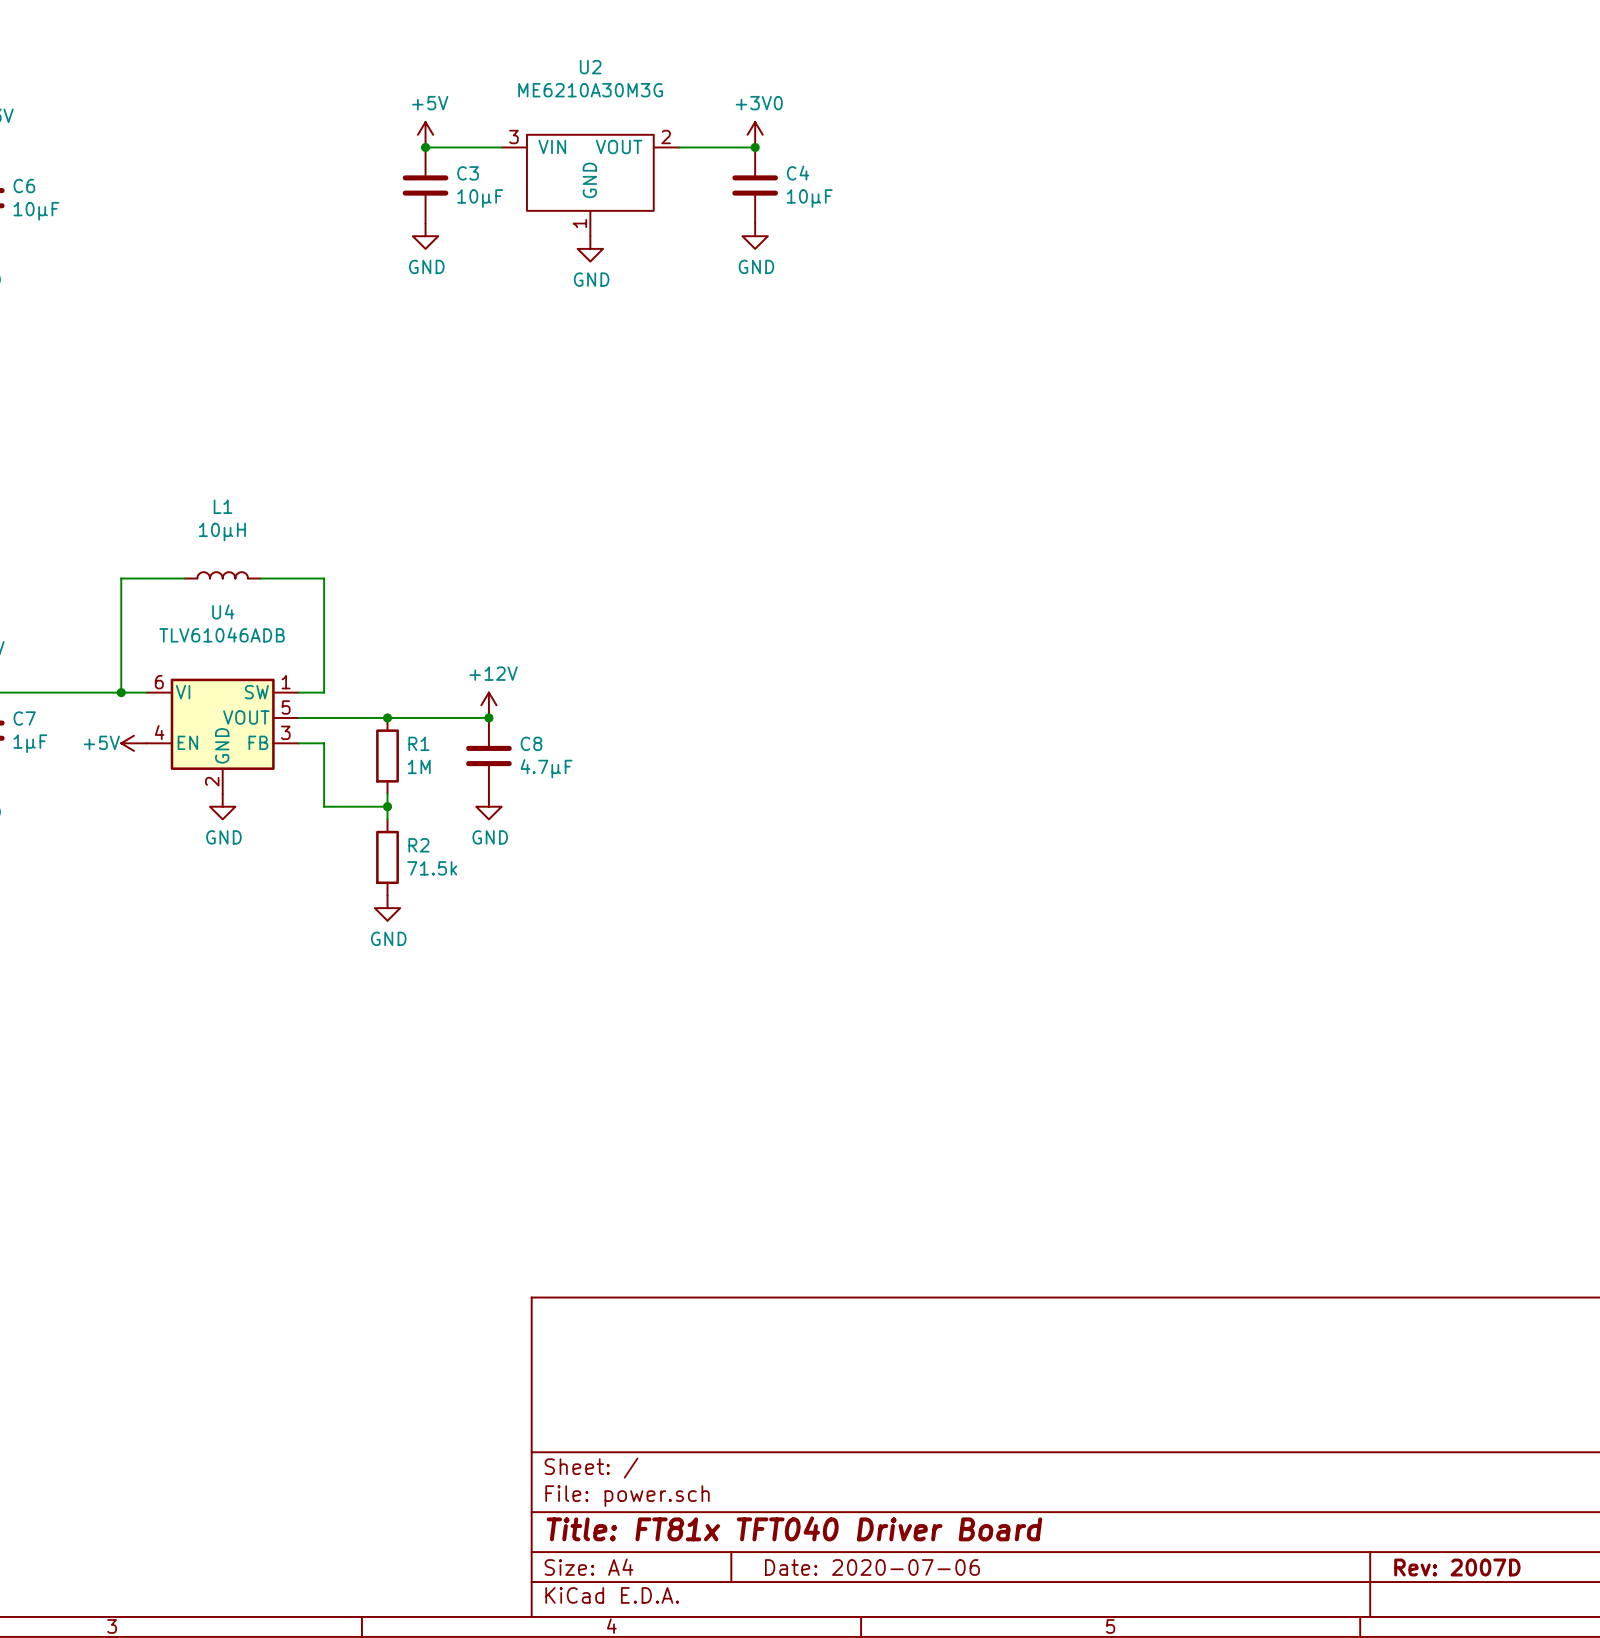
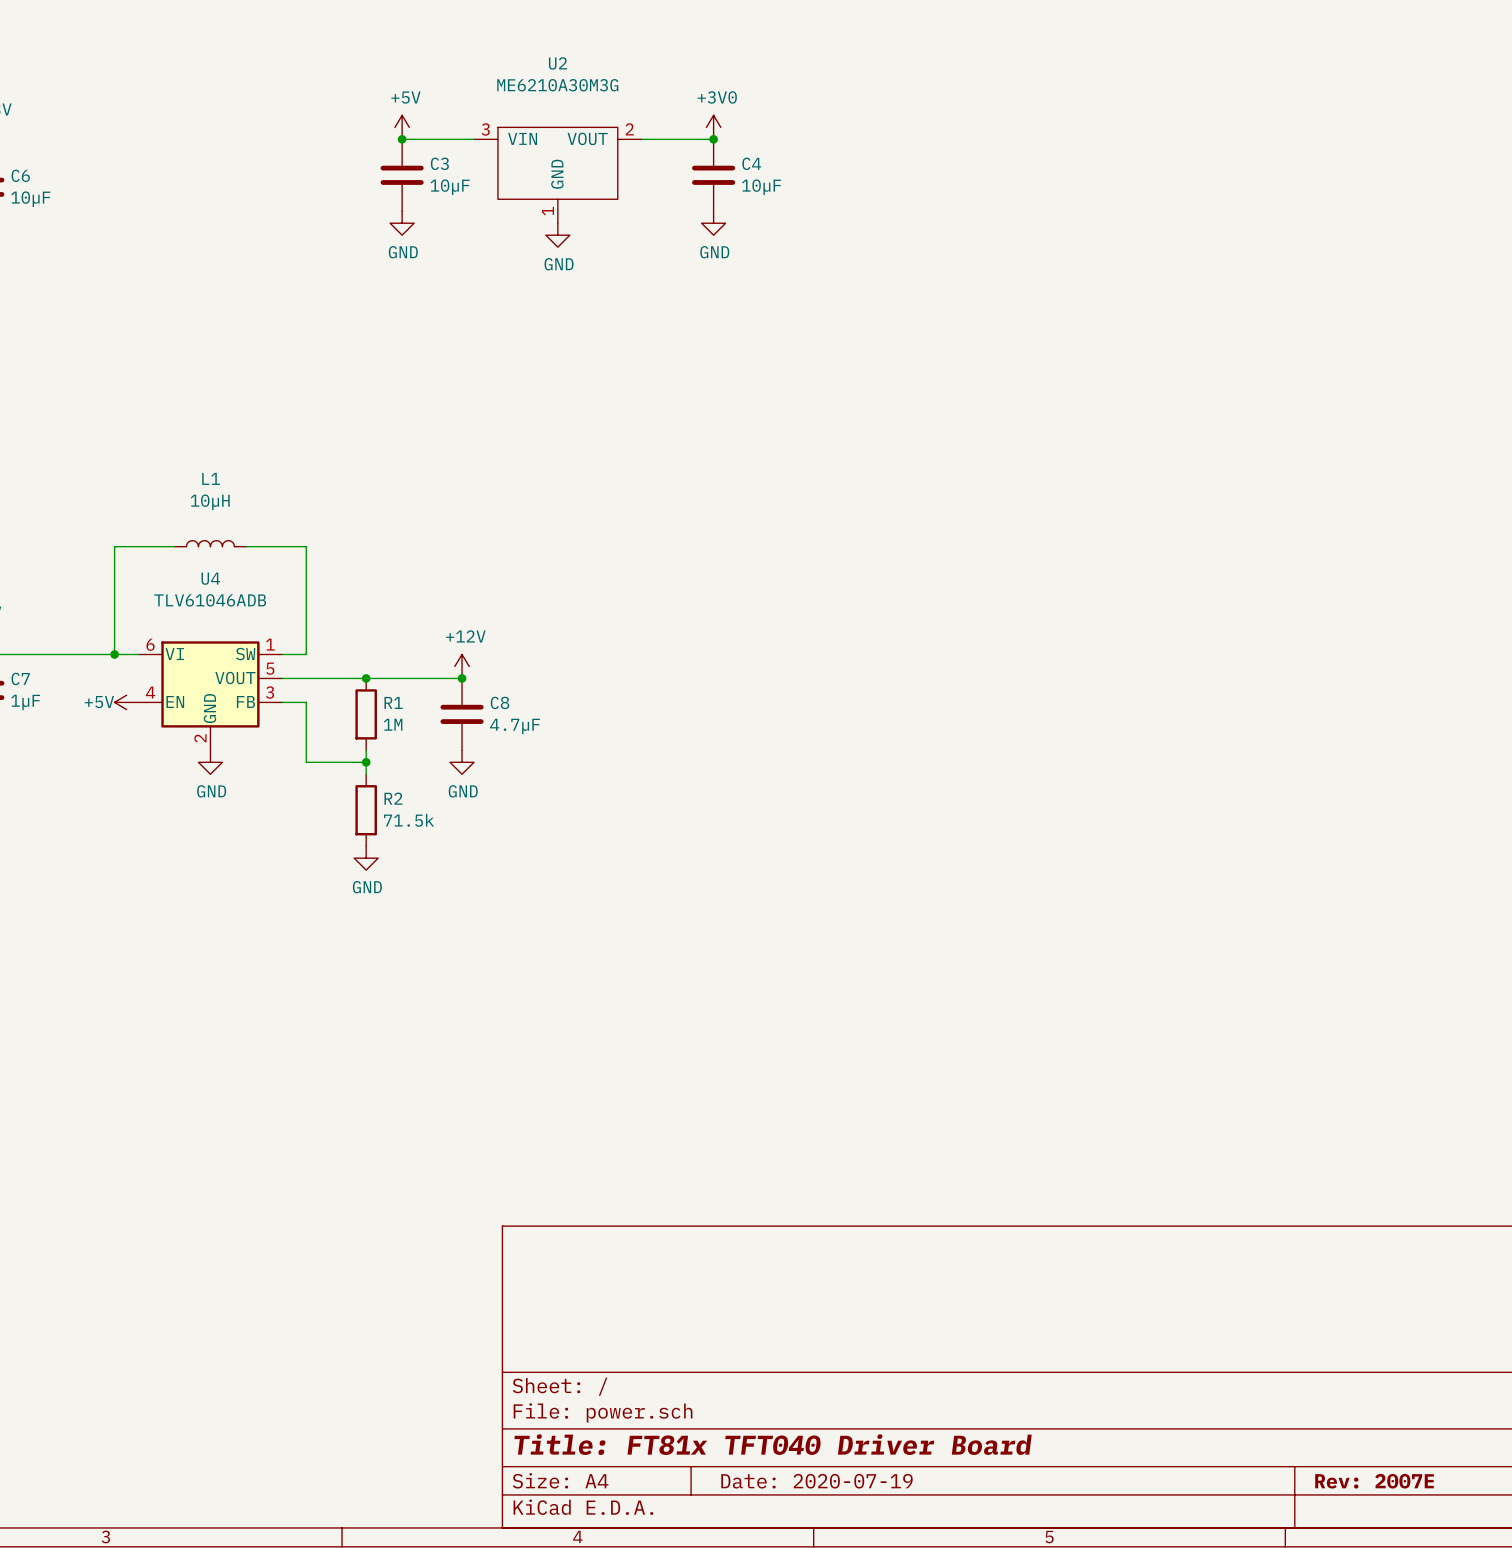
title block: Date: 2020-07-06 (872, 1567) -> Date: 2020-07-19 (817, 1481)
title block: Rev: 2007D (1457, 1567) -> Rev: 2007E (1374, 1481)

